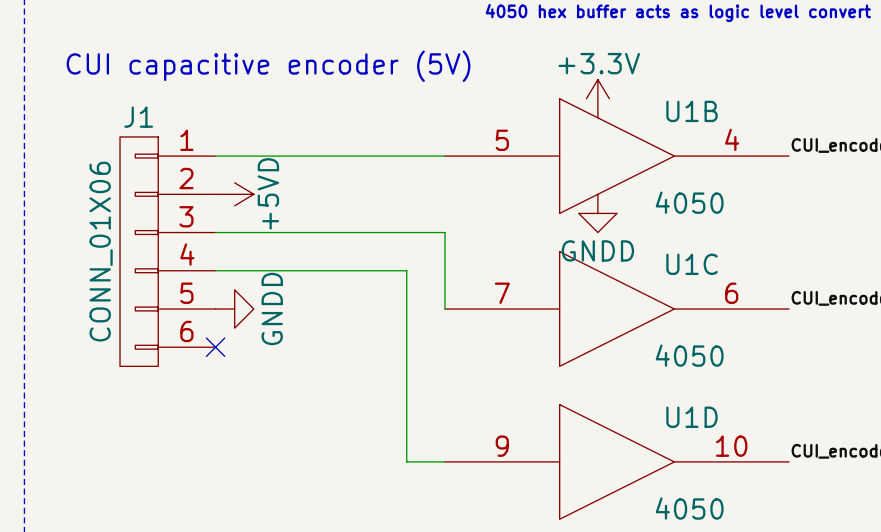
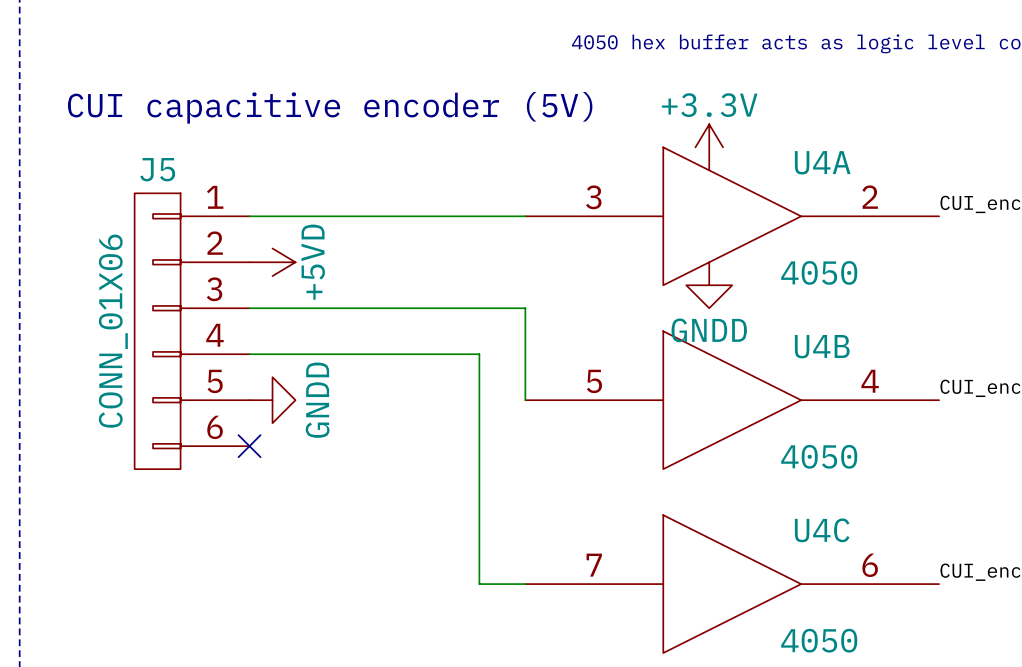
U1B name: U1B (692, 111) -> U4A (822, 162)
J1 name: J1 (138, 117) -> J5 (157, 169)
U1B pin number: 4 (732, 139) -> 2 (870, 197)
U1B pin number: 5 (502, 140) -> 3 (593, 197)
U1C name: U1C (692, 264) -> U4B (822, 346)
U1C pin number: 7 (502, 293) -> 5 (594, 381)
U1C pin number: 6 (731, 293) -> 4 (870, 381)
U1D name: U1D (692, 417) -> U4C (822, 530)
U1D pin number: 9 (502, 446) -> 7 (594, 565)
U1D pin number: 10 (731, 446) -> 6 (870, 565)

